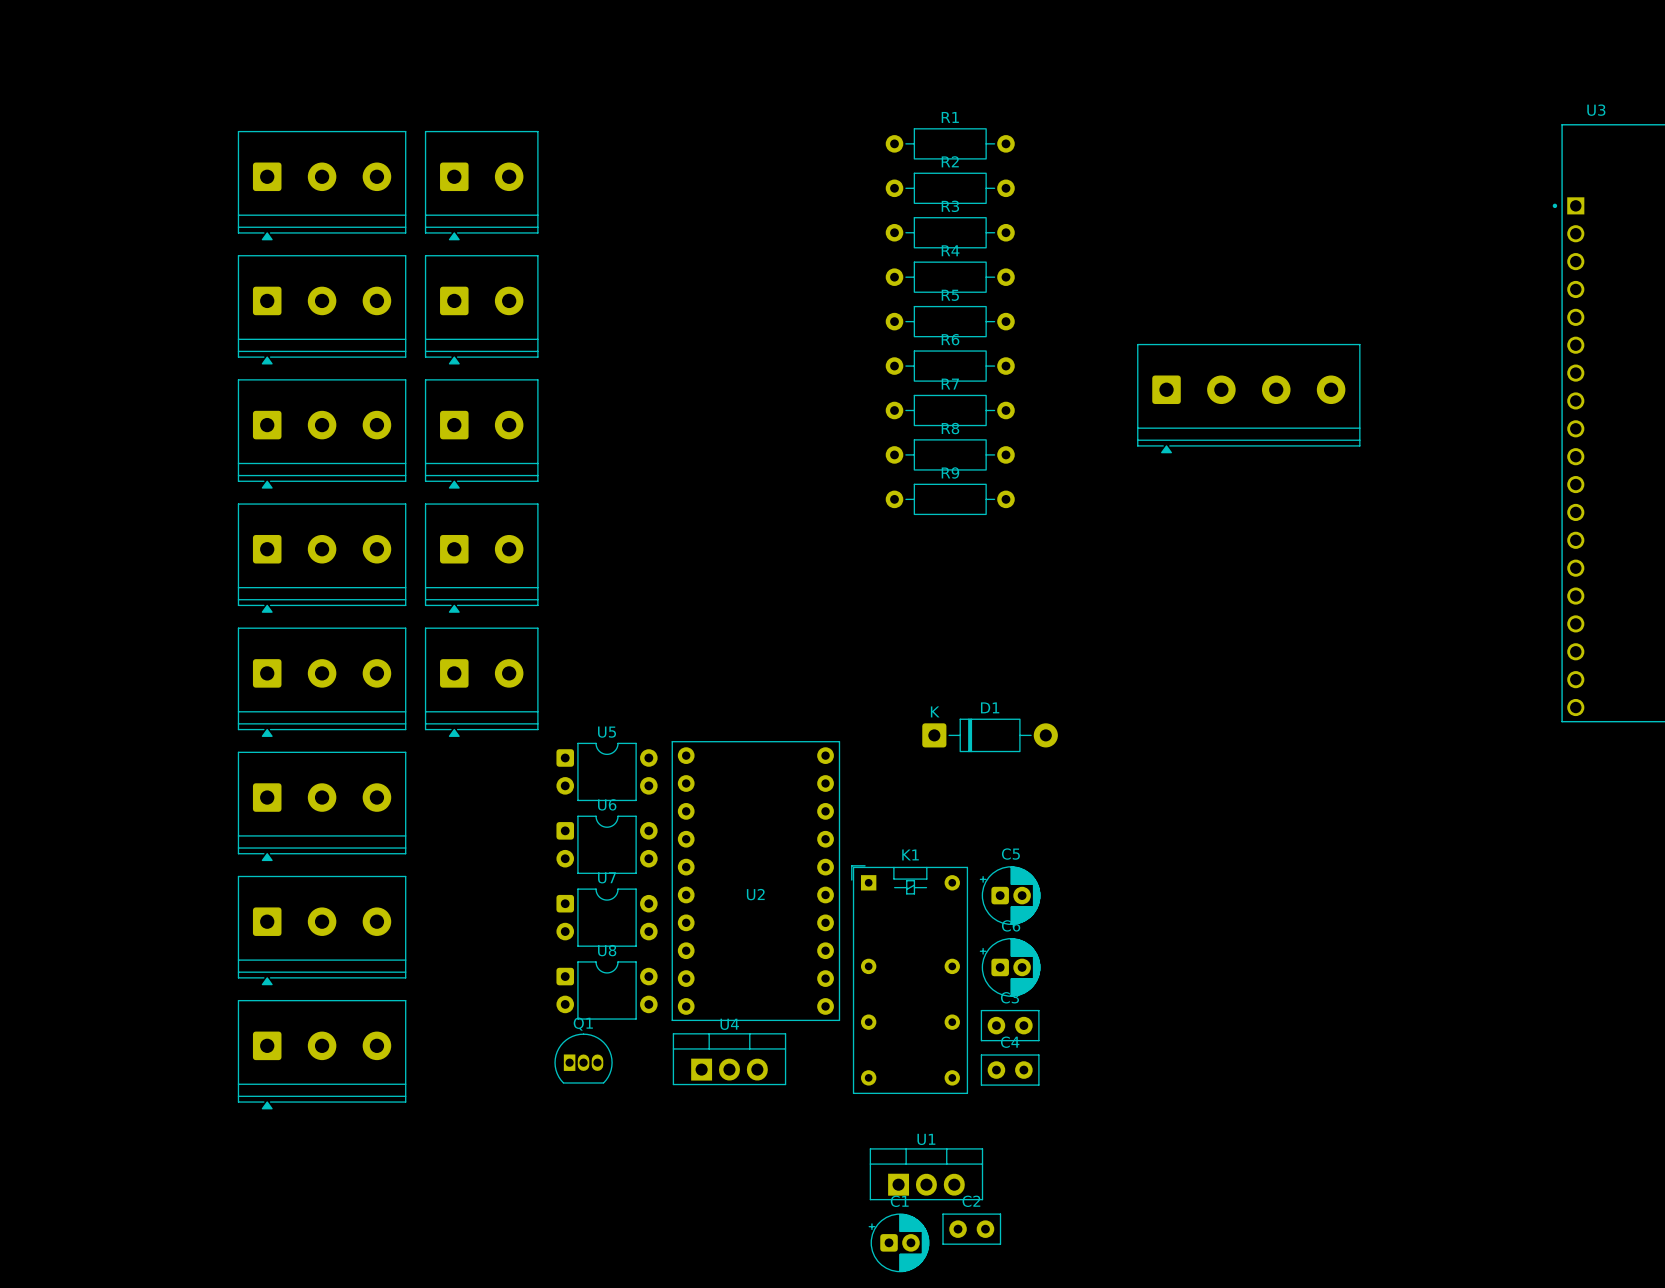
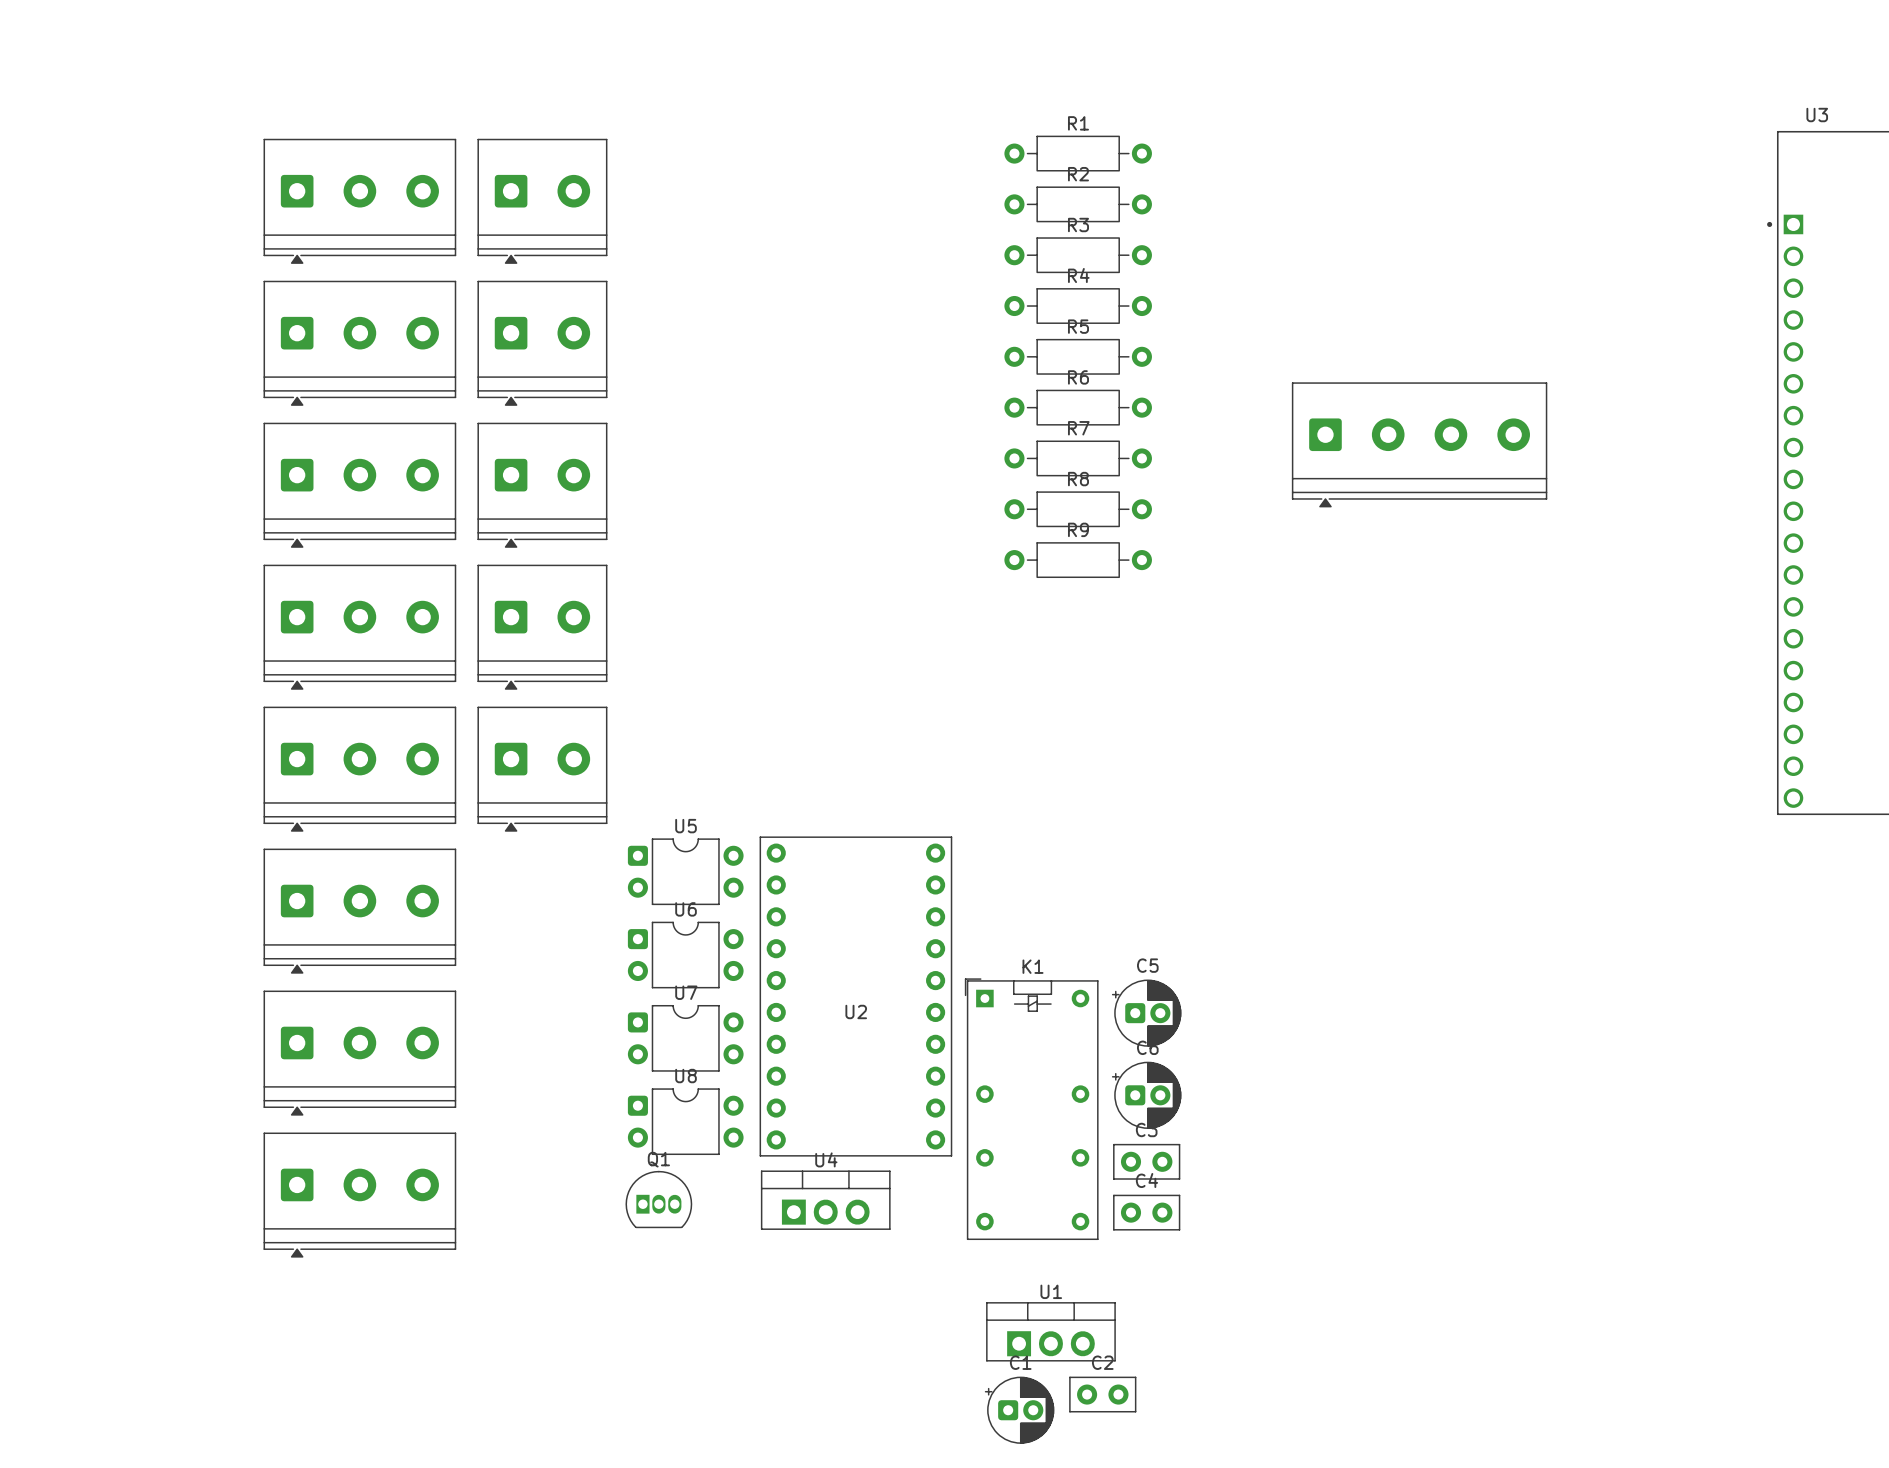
D1: (990, 735) -> none

